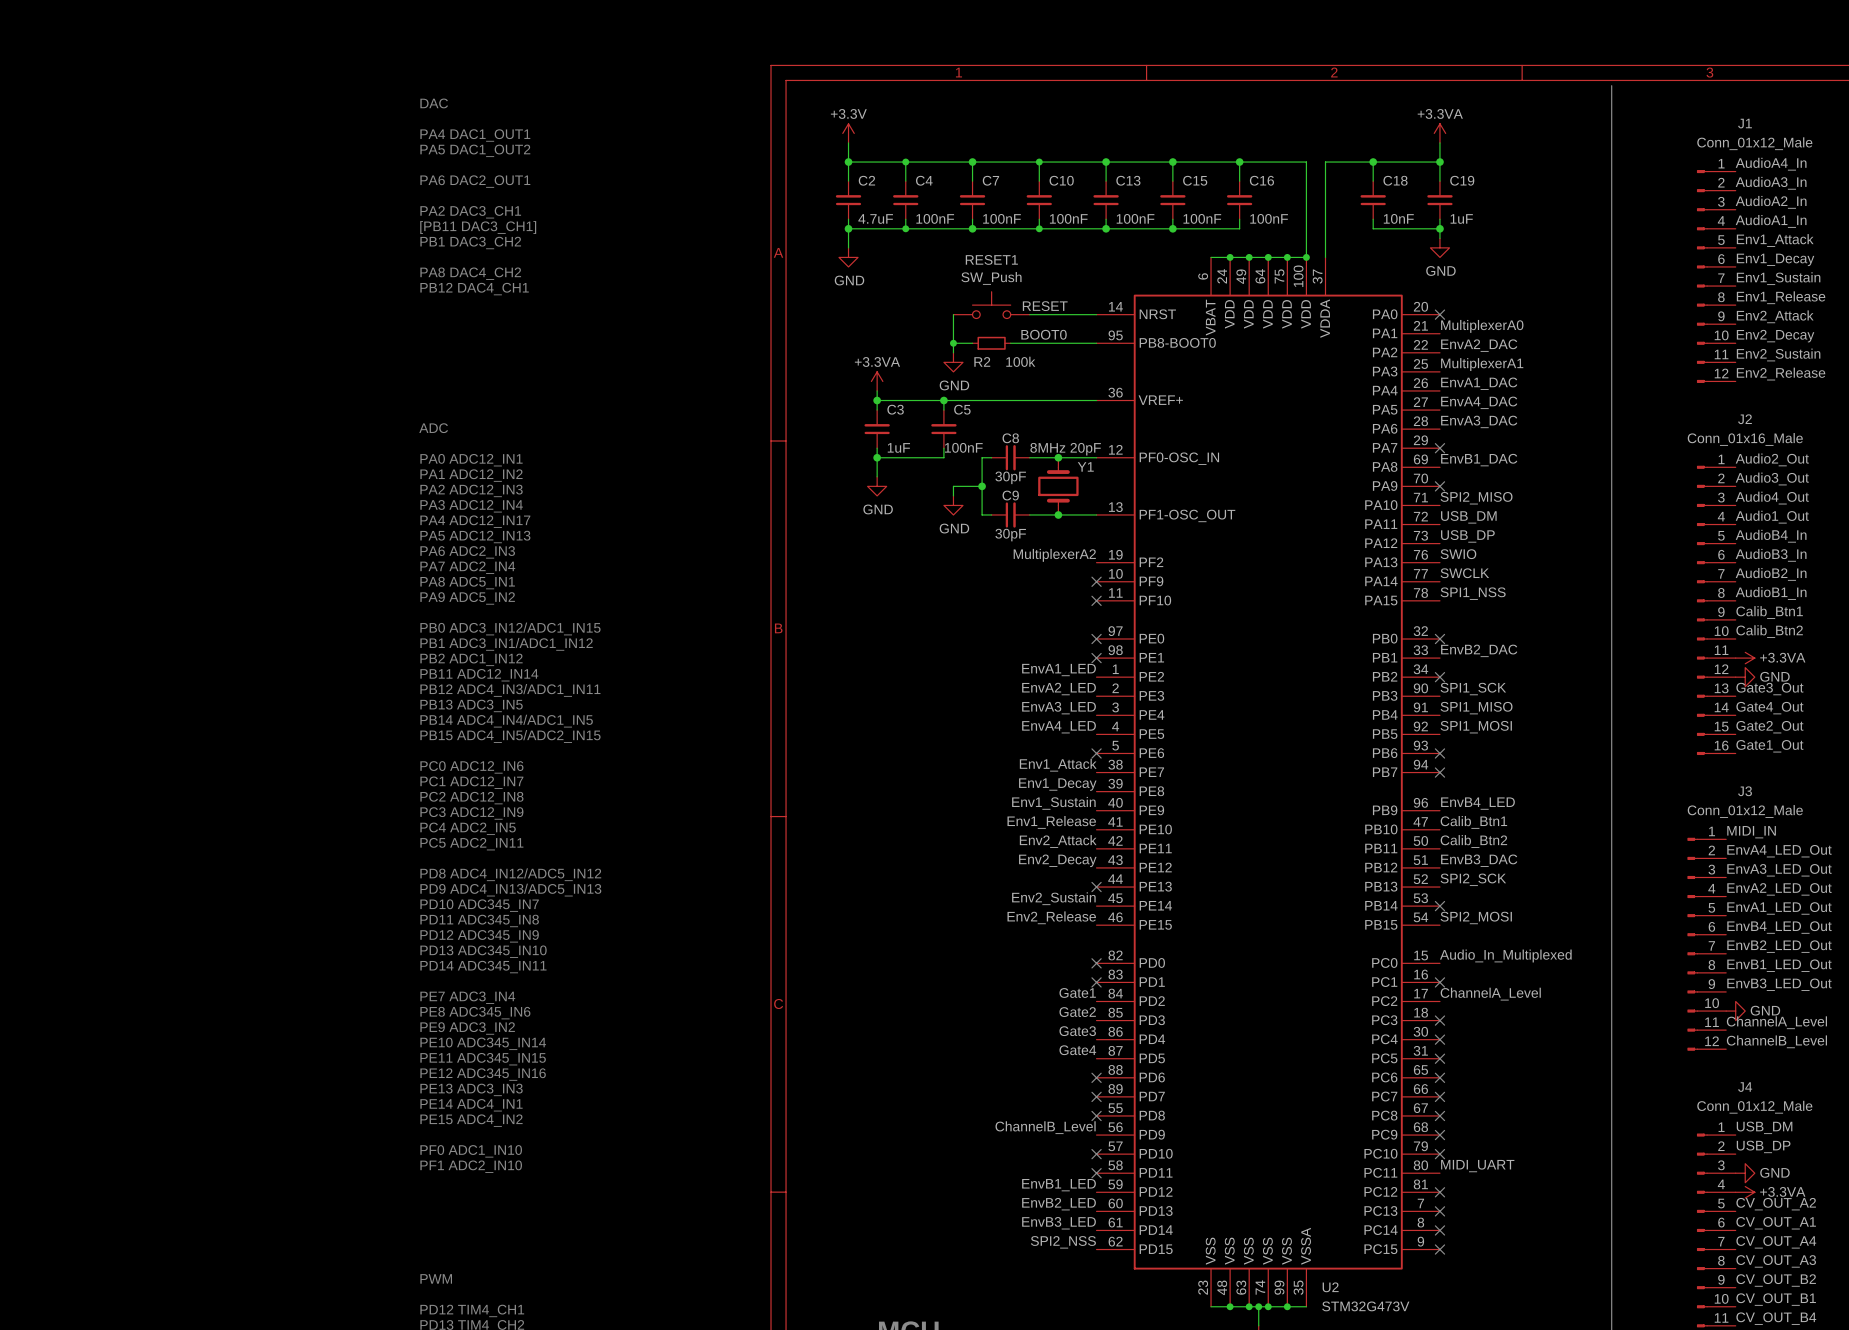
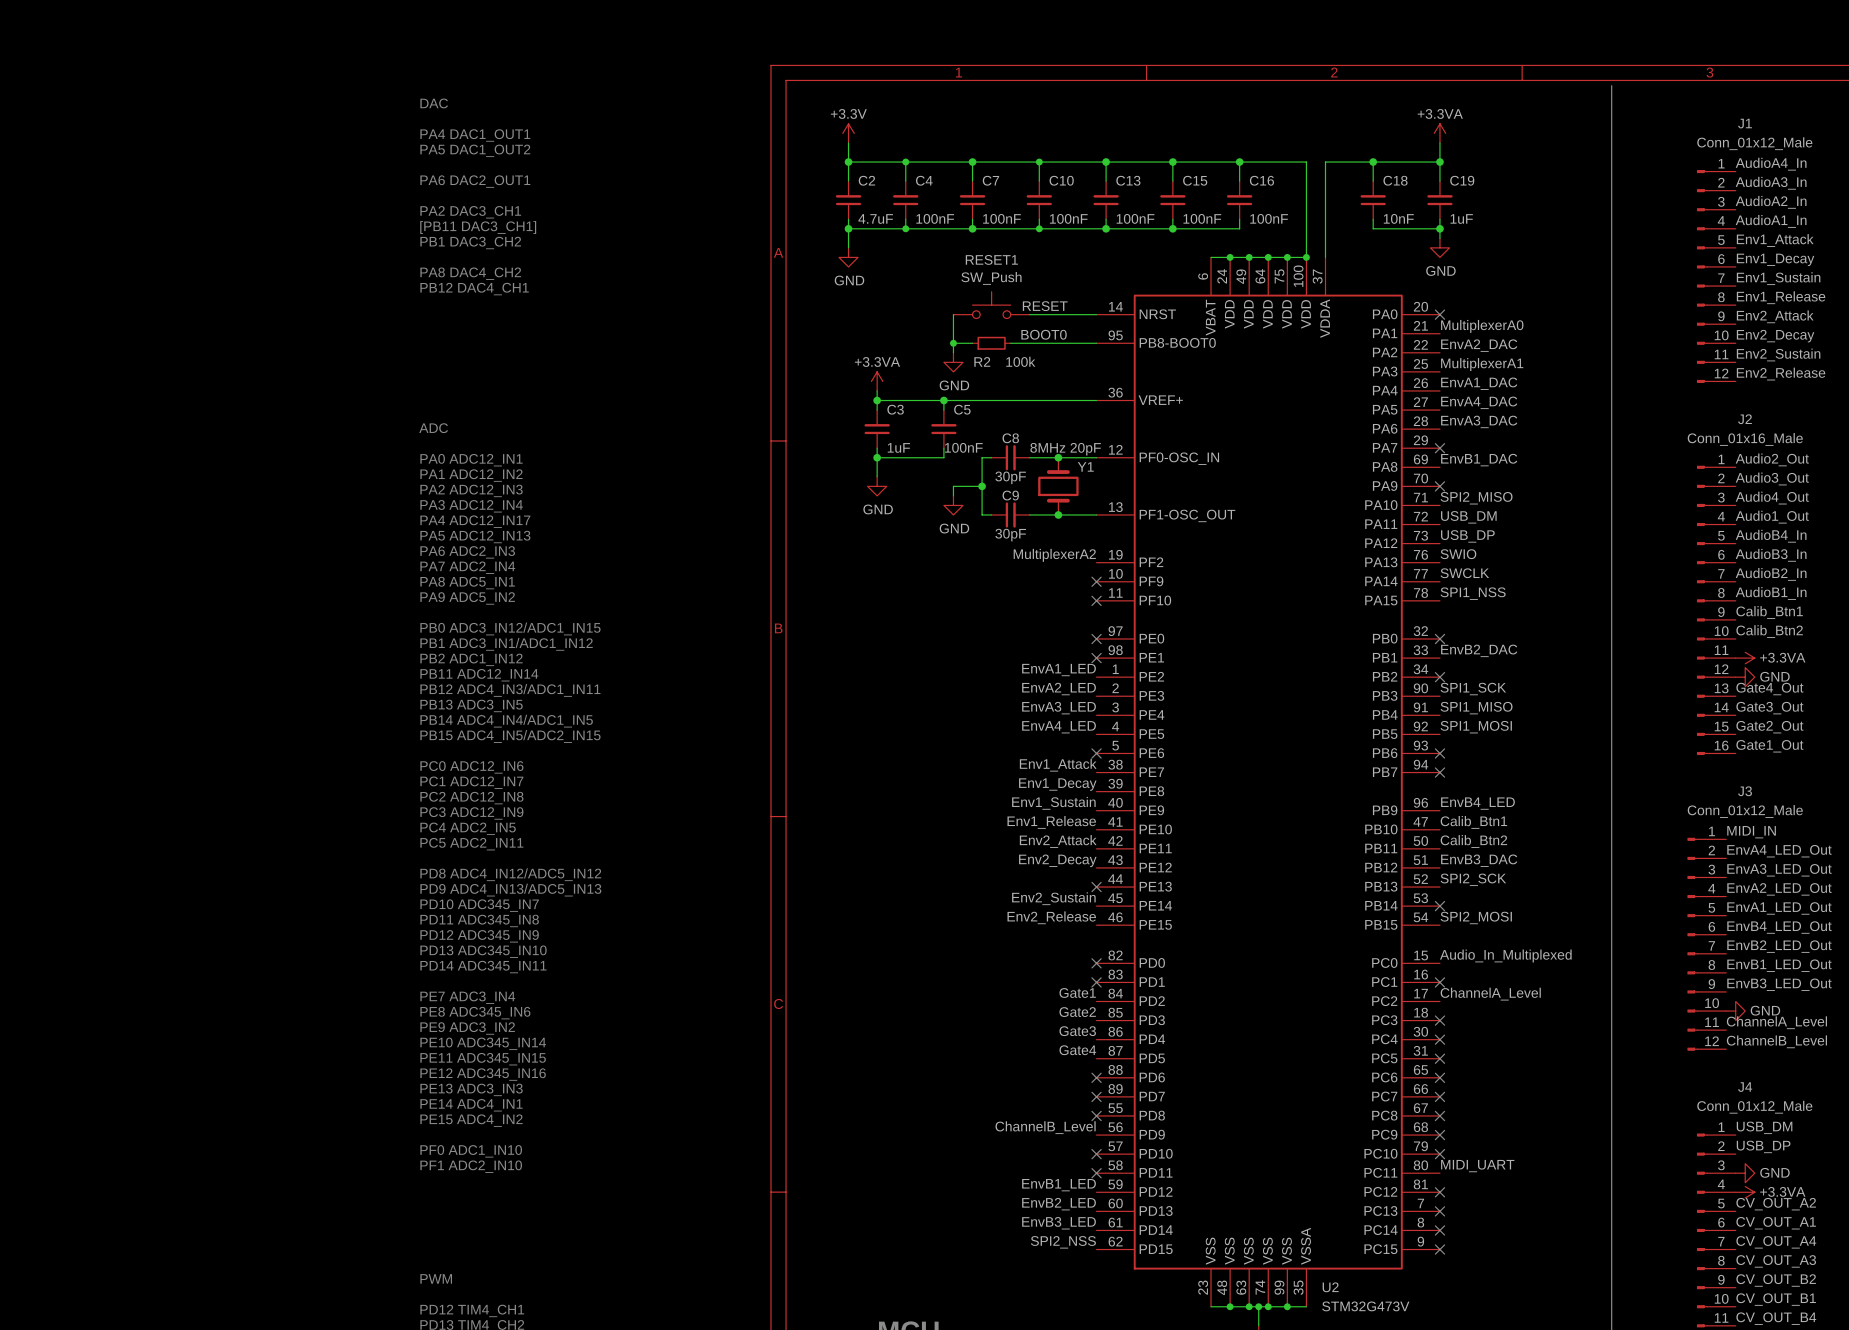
label: Gate3_Out (1769, 689) -> Gate4_Out (1769, 689)
label: Gate4_Out (1769, 708) -> Gate3_Out (1769, 708)

